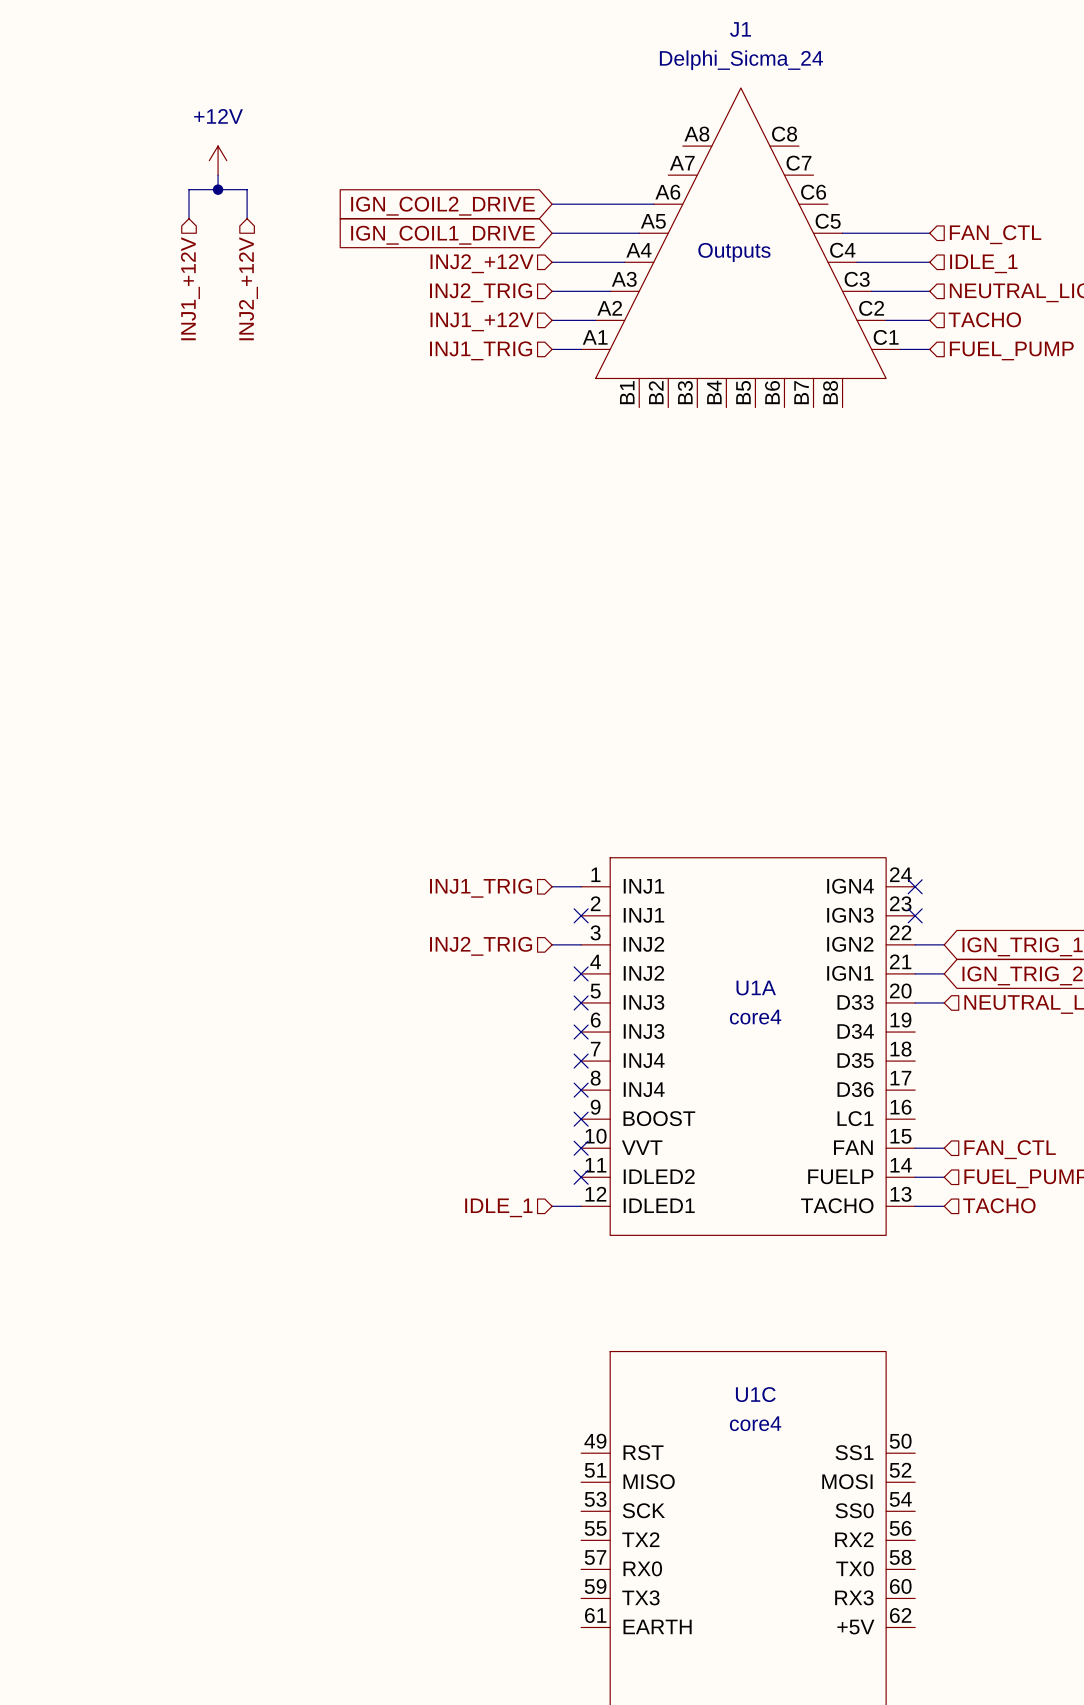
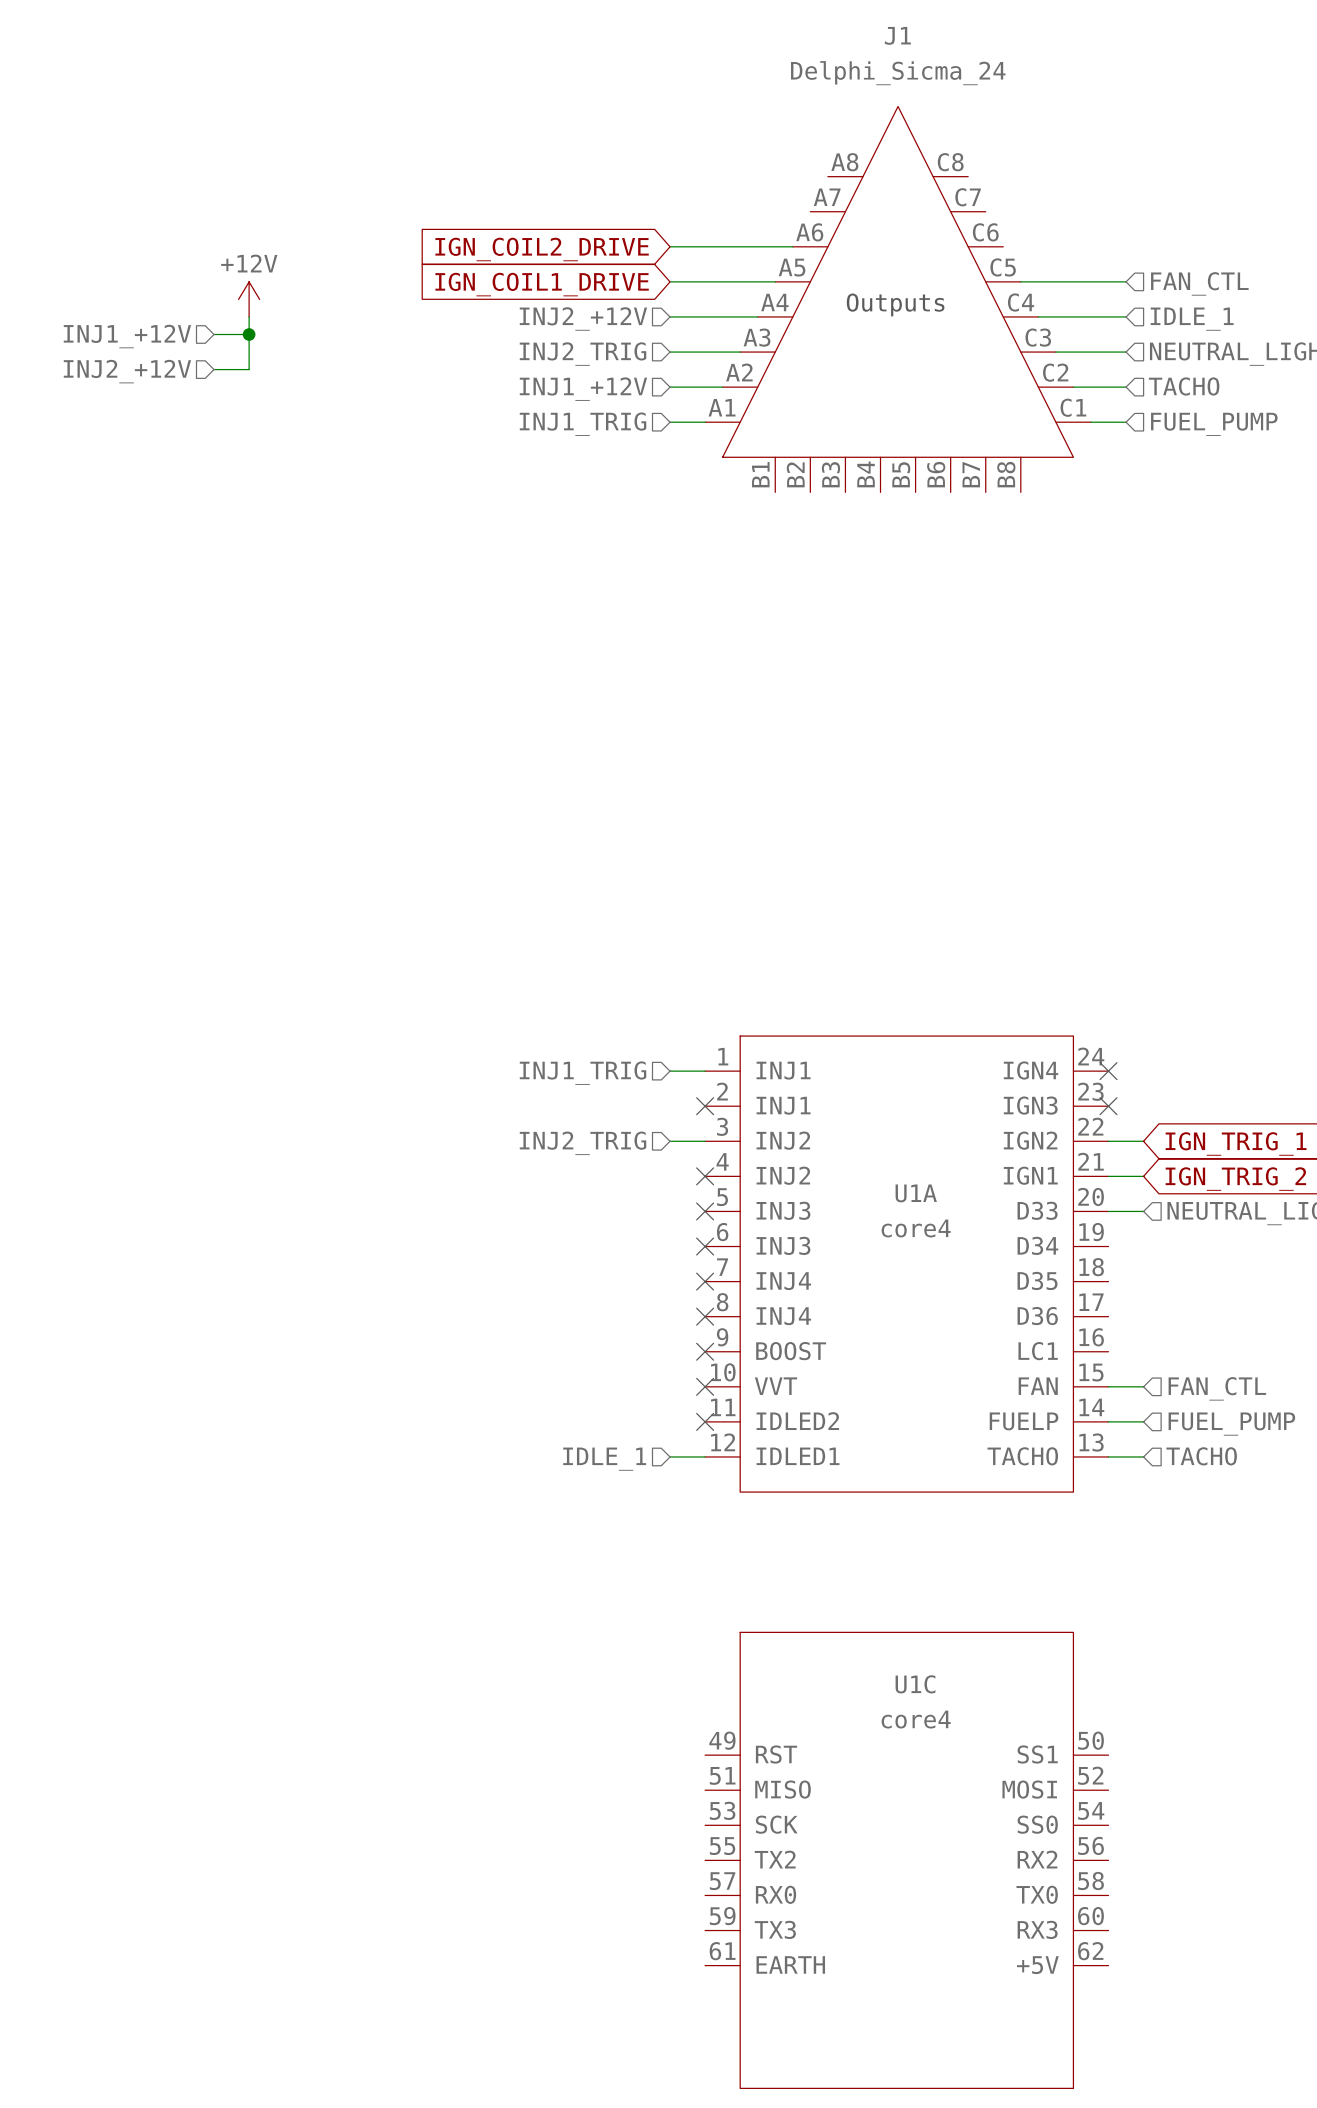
power symbol text position: +12V (218, 116) -> +12V (249, 263)
power symbol position: +12V (218, 160) -> +12V (249, 299)
wire: (218, 175) (218, 189) -> none
junction: (218, 189) -> none
wire: (189, 218) (189, 189) (247, 189) (247, 218) -> none
wire: none -> (249, 316) (249, 369) (214, 369)
wire: none -> (214, 334) (249, 334)
junction: none -> (249, 334)
hierarchical label rotation: 0° (190, 288) -> 90° clockwise (127, 336)
hierarchical label rotation: 0° (248, 288) -> 90° clockwise (127, 371)
hierarchical label position: INJ2_+12V (248, 288) -> INJ2_+12V (127, 371)

